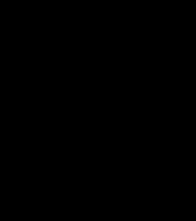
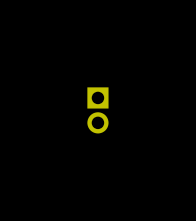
part: none -> (97, 110)

